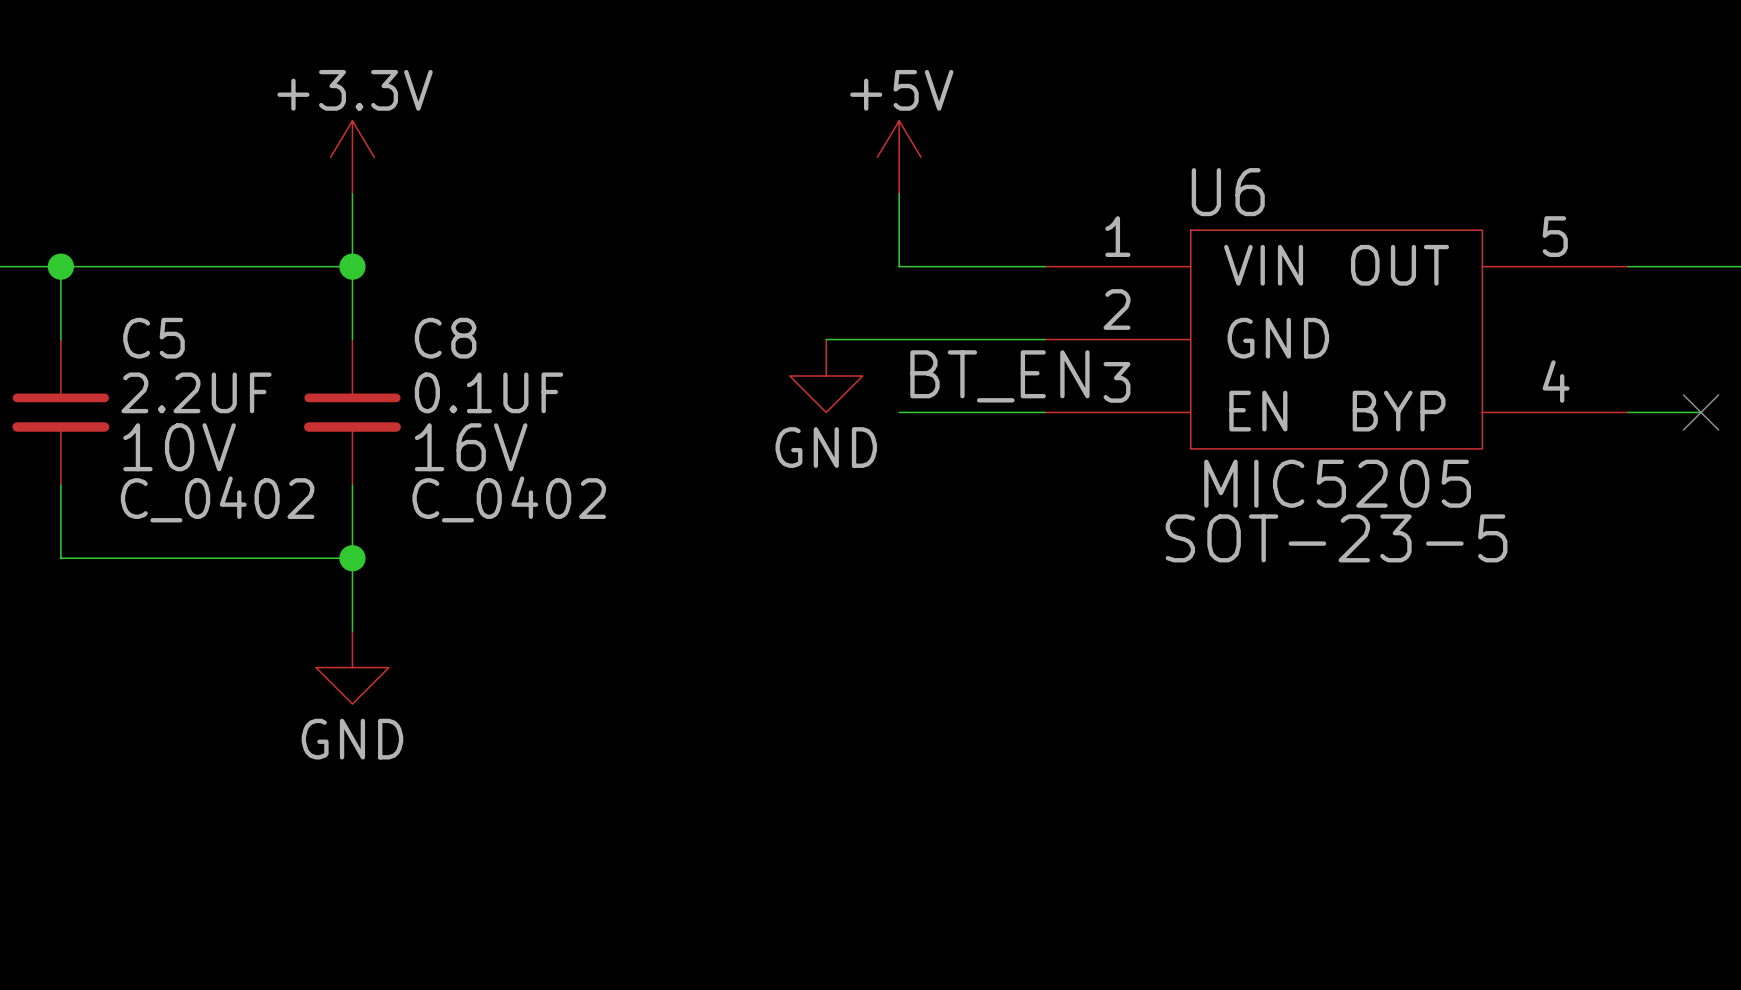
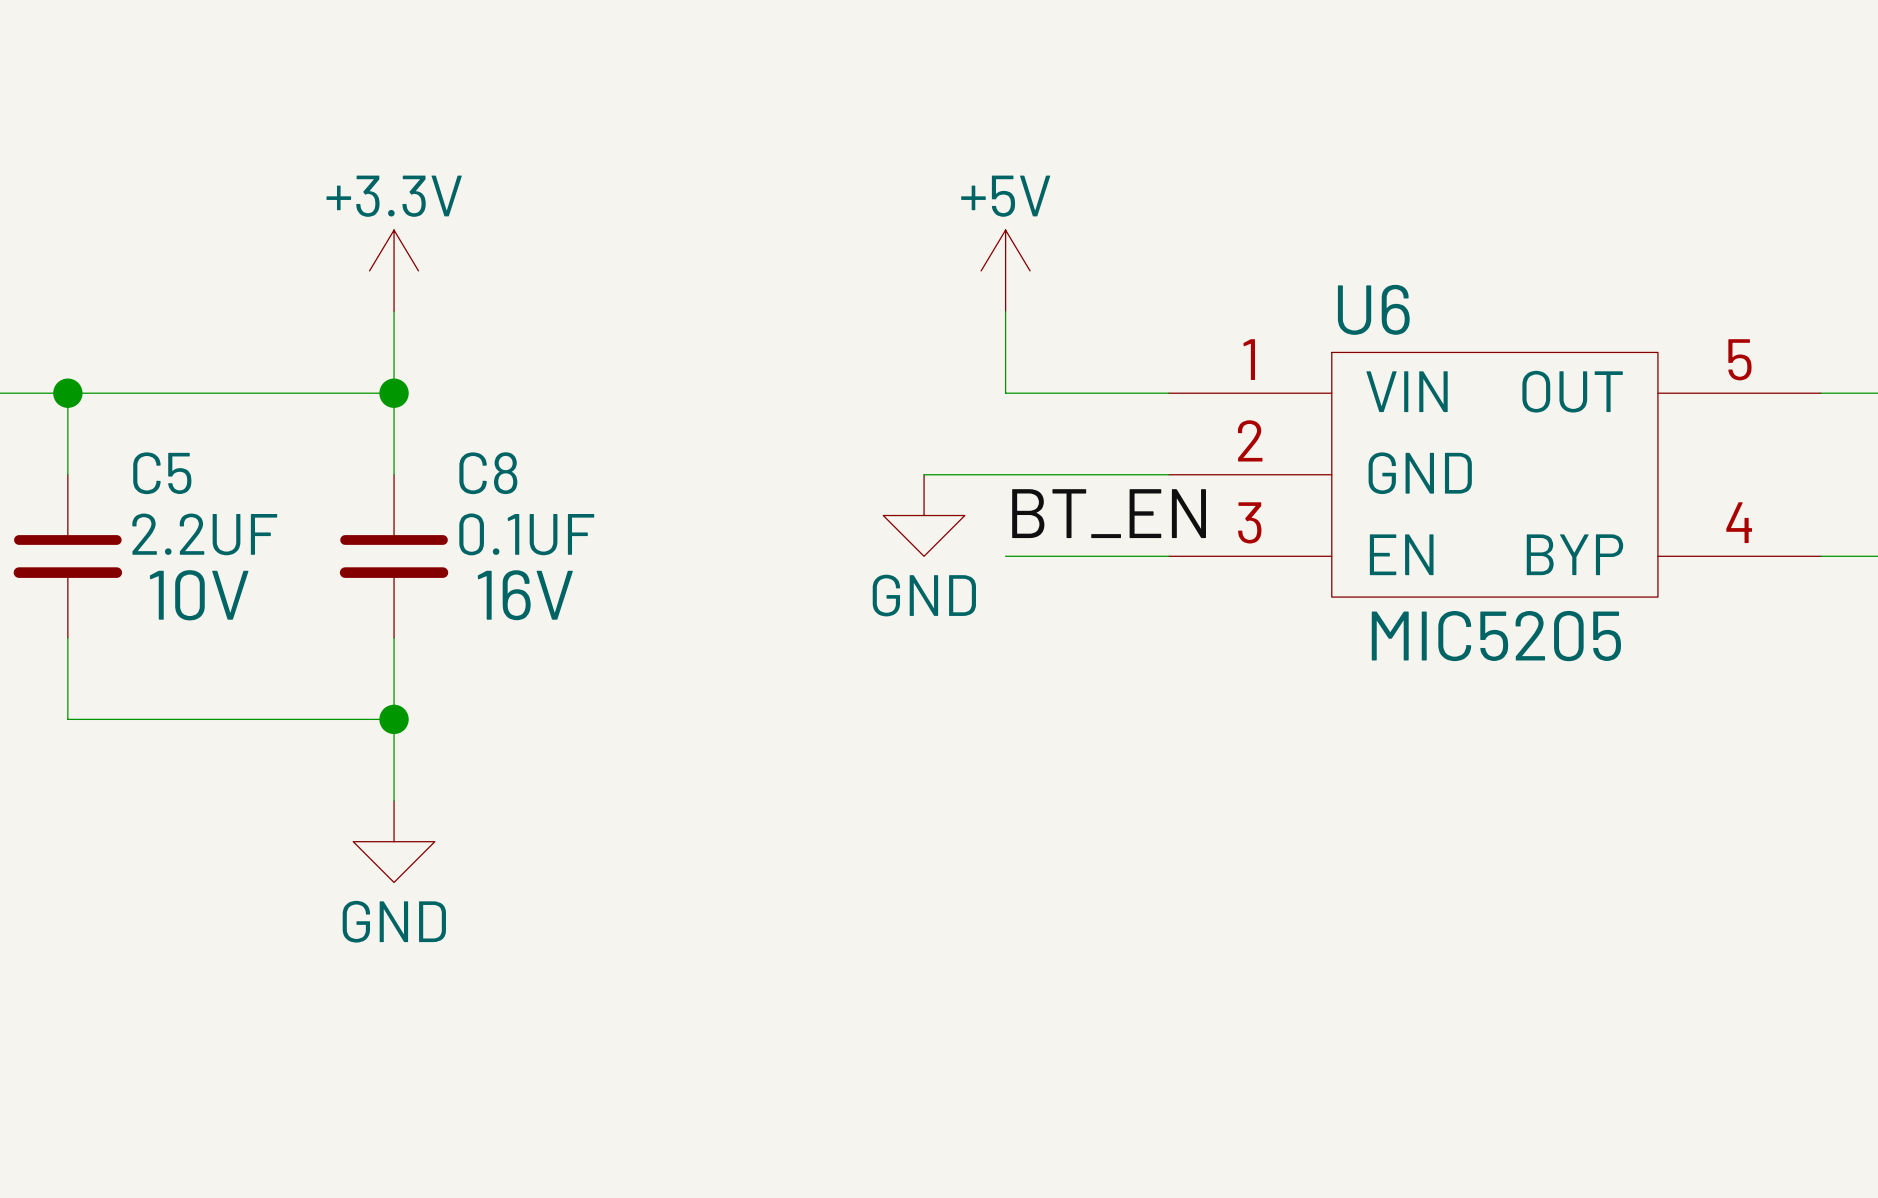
C5 text: C_0402 (217, 499) -> none
C8 text: C_0402 (509, 499) -> none
U6 text: SOT-23-5 (1336, 538) -> none

